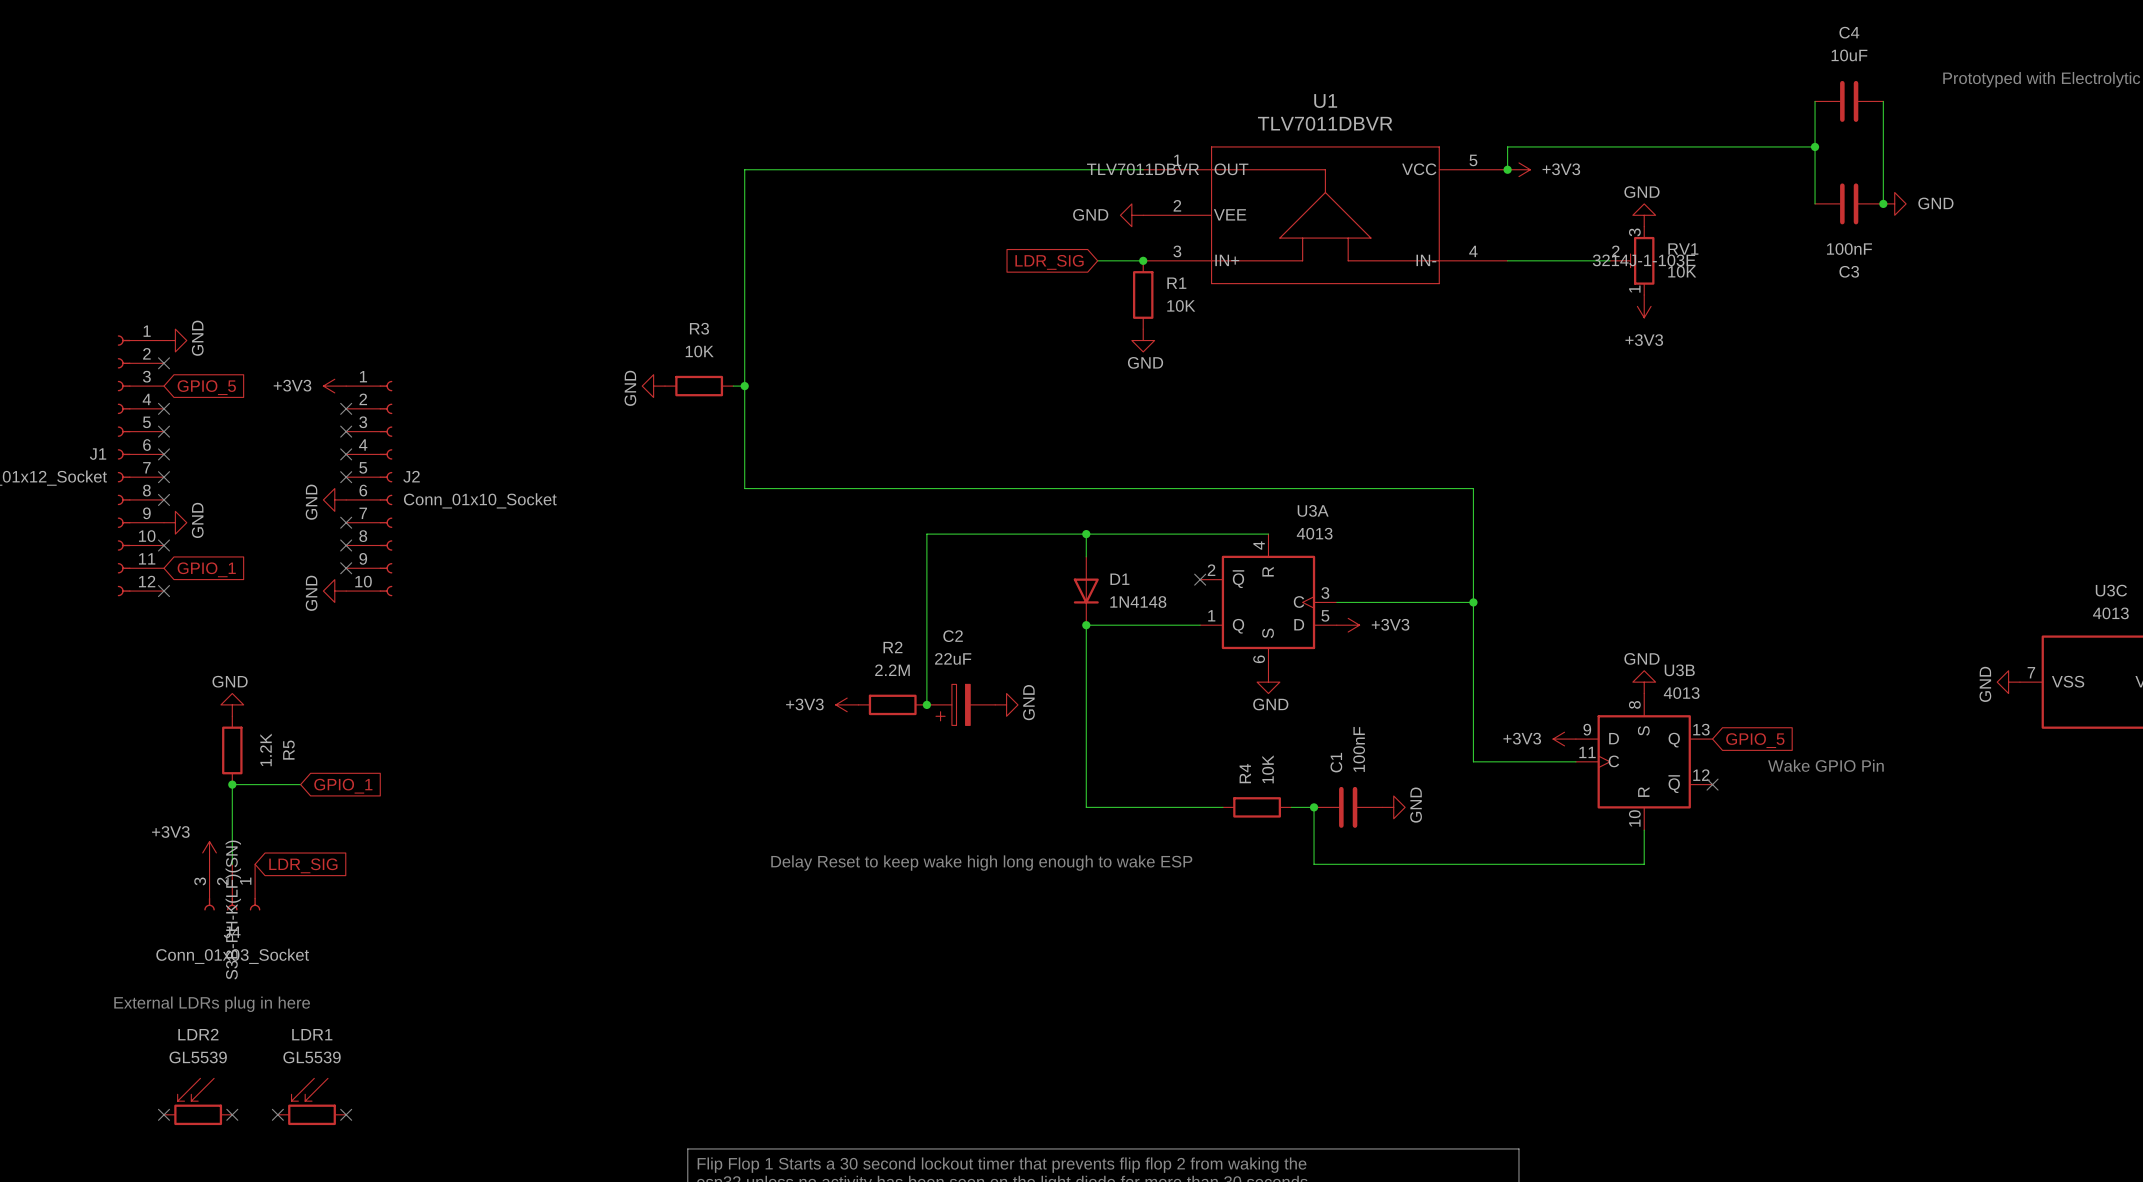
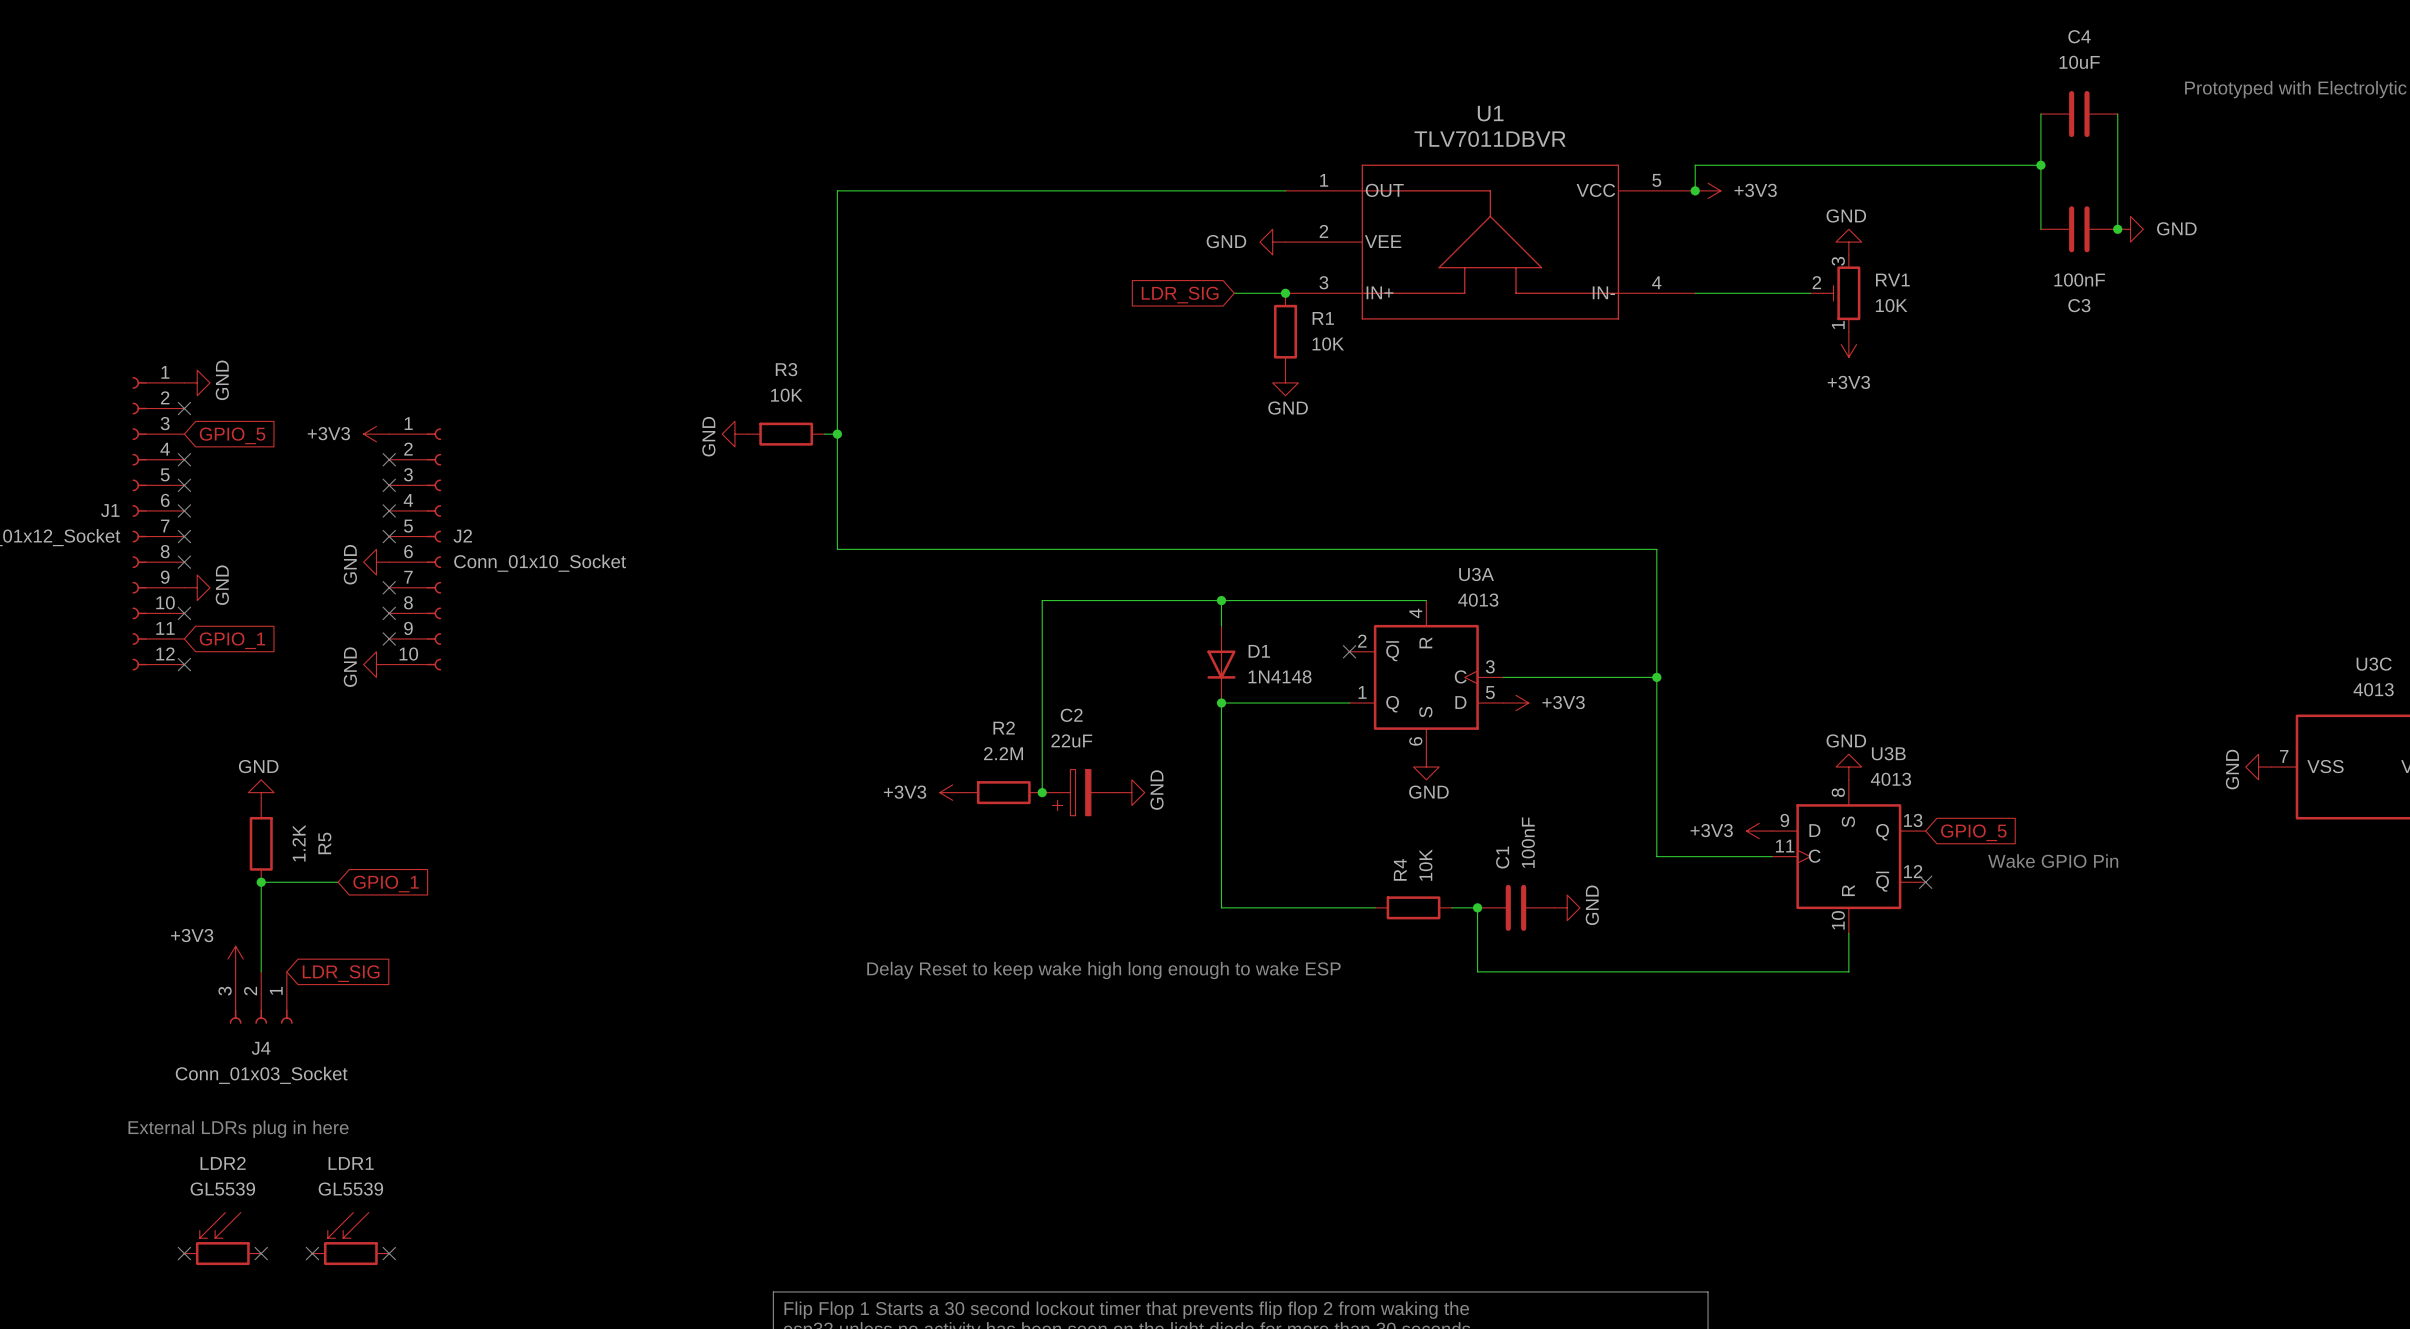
U1 text: TLV7011DBVR (1143, 169) -> none
RV1 text: 3214J-1-103E (1644, 260) -> none
J4 text: S3B-PH-K(LF)(SN) (233, 910) -> none

